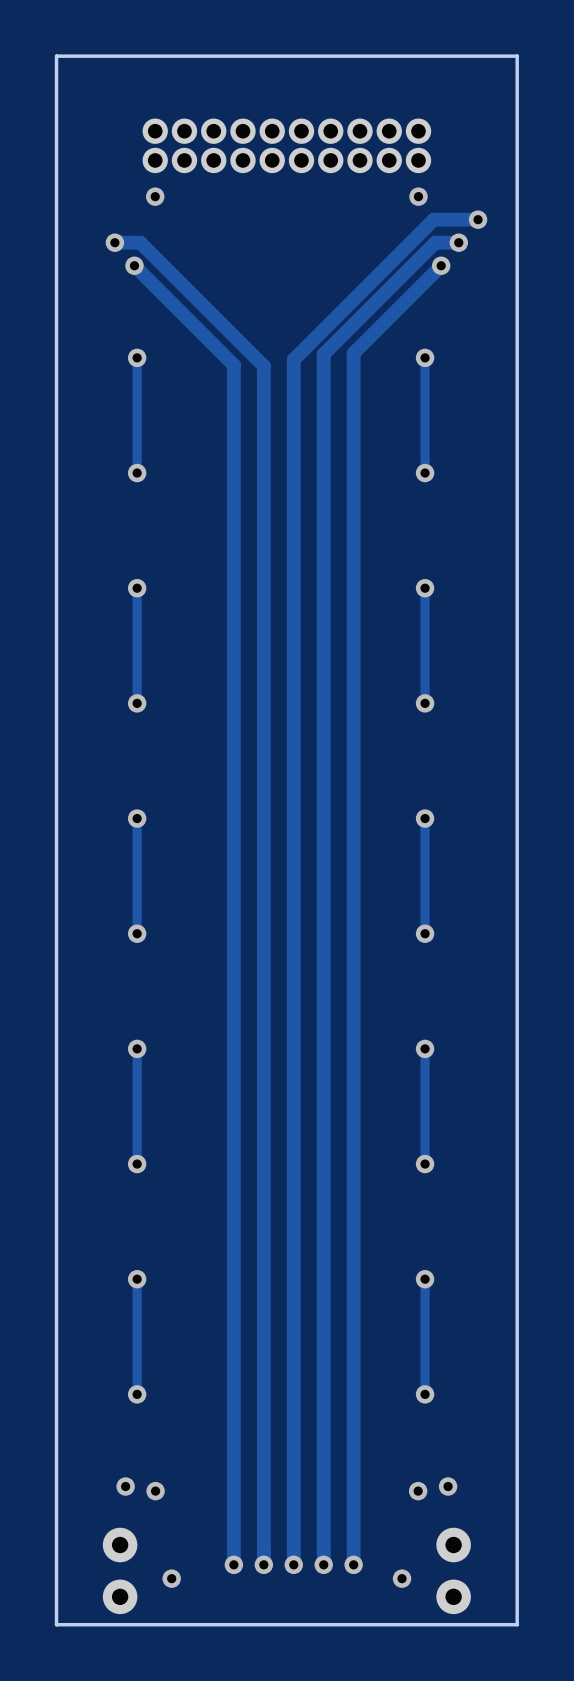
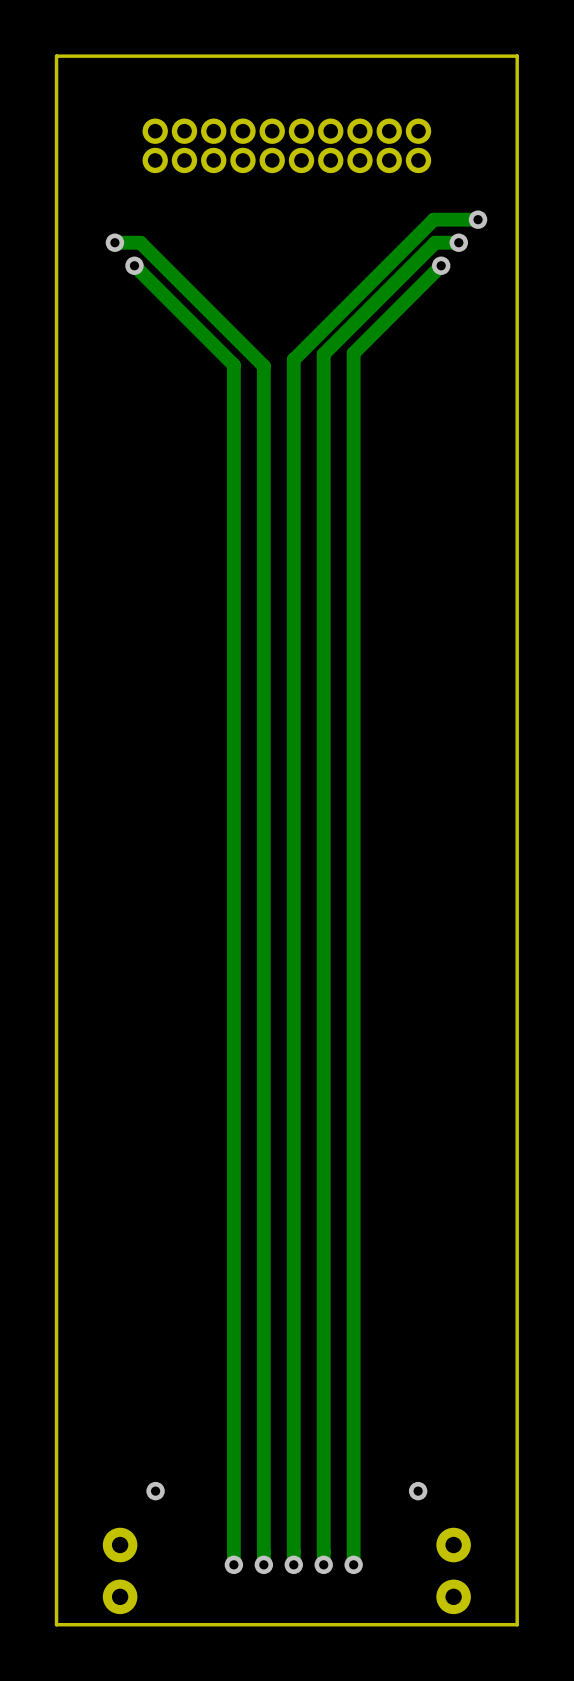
via: (155, 196) -> none
via: (418, 196) -> none
track: (137, 357) (137, 473) -> none
via: (137, 357) -> none
track: (425, 357) (425, 473) -> none
via: (425, 357) -> none
via: (137, 473) -> none
via: (425, 473) -> none
track: (137, 588) (137, 703) -> none
via: (137, 588) -> none
track: (425, 588) (425, 703) -> none
via: (425, 588) -> none
via: (137, 703) -> none
via: (425, 703) -> none
track: (137, 818) (137, 933) -> none
via: (137, 818) -> none
track: (425, 818) (425, 933) -> none
via: (425, 818) -> none
via: (137, 933) -> none
via: (425, 933) -> none
track: (137, 1048) (137, 1164) -> none
via: (137, 1048) -> none
track: (425, 1048) (425, 1164) -> none
via: (425, 1048) -> none
via: (137, 1164) -> none
via: (425, 1164) -> none
track: (137, 1279) (137, 1394) -> none
via: (137, 1279) -> none
track: (425, 1279) (425, 1394) -> none
via: (425, 1279) -> none
via: (137, 1394) -> none
via: (425, 1394) -> none
via: (125, 1486) -> none
via: (448, 1486) -> none
via: (171, 1578) -> none
via: (402, 1578) -> none

